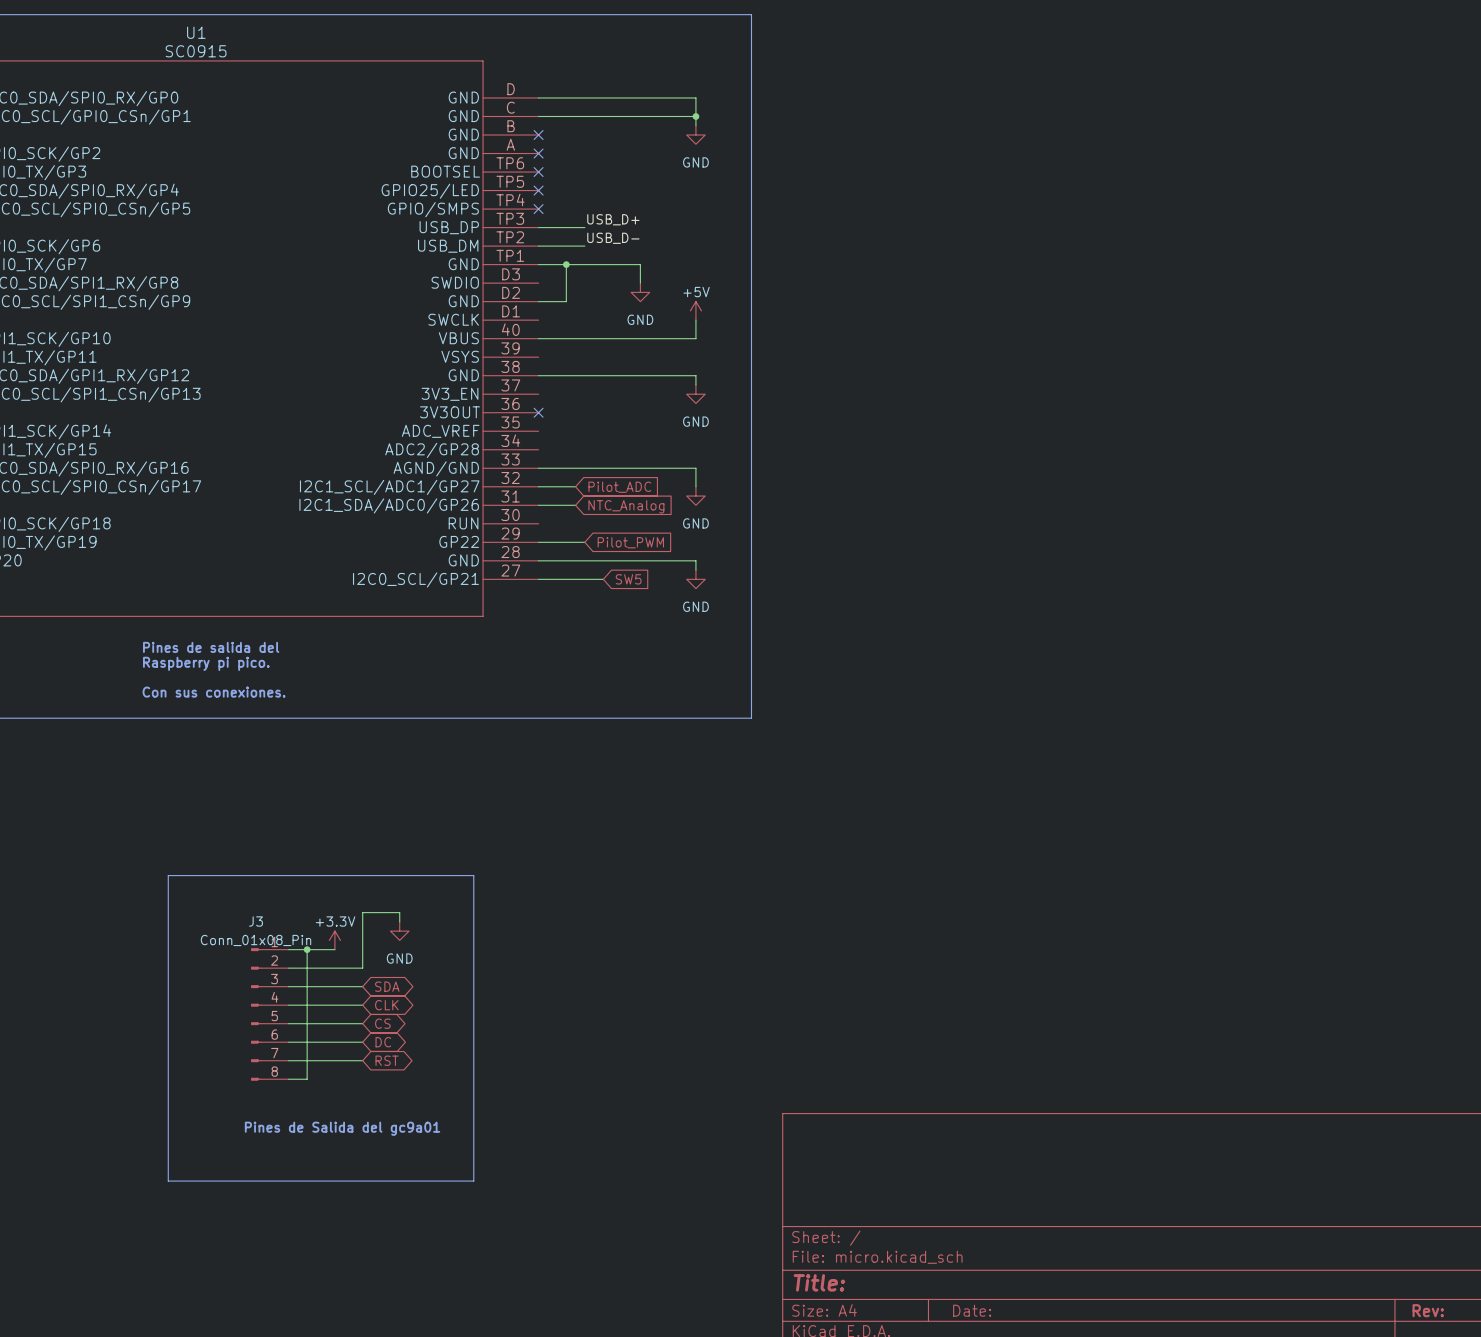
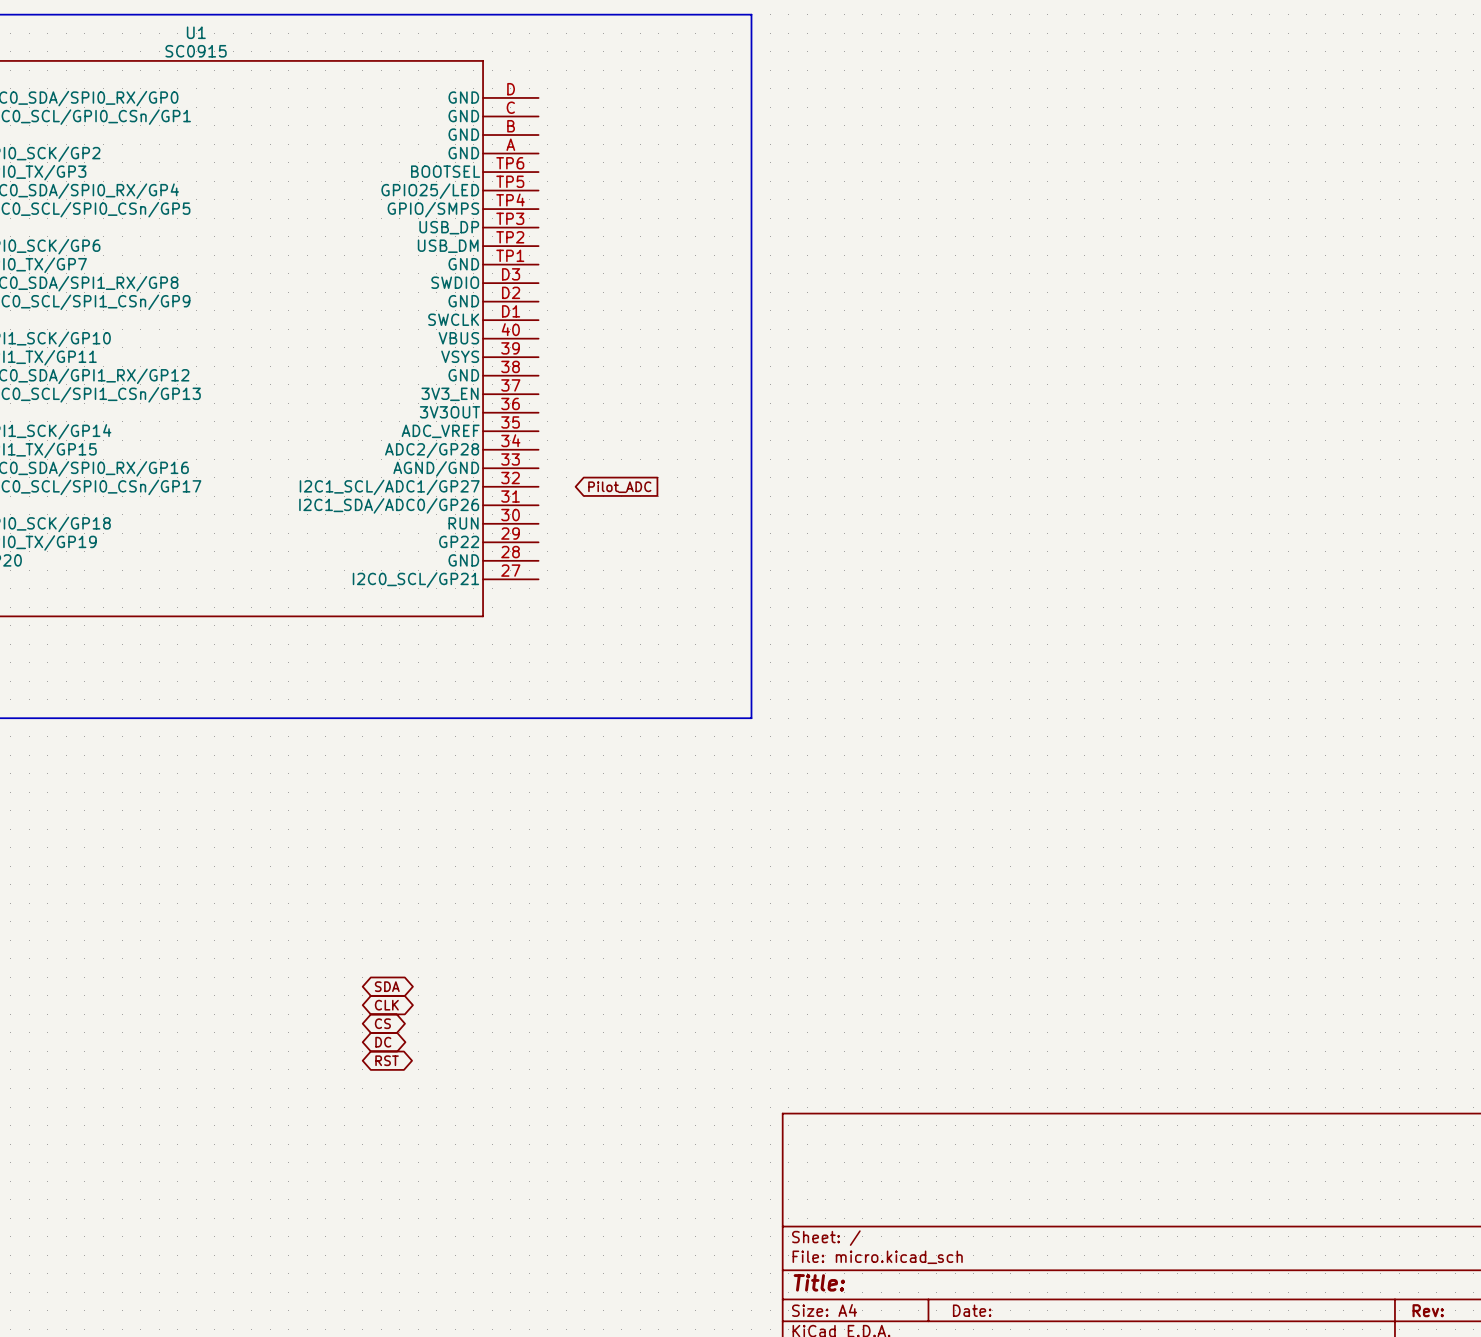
wire: (538, 97) (695, 97) (695, 125) -> none
wire: (538, 116) (695, 116) -> none
junction: (695, 116) -> none
no-connect mark: (538, 135) -> none
power symbol: GND (695, 135) -> none
no-connect mark: (538, 153) -> none
no-connect mark: (538, 172) -> none
no-connect mark: (538, 190) -> none
no-connect mark: (538, 209) -> none
label: USB_D+ (613, 219) -> none
wire: (538, 227) (584, 227) -> none
label: USB_D- (613, 238) -> none
wire: (538, 246) (584, 246) -> none
wire: (538, 264) (640, 264) (640, 283) -> none
wire: (566, 264) (566, 301) (538, 301) -> none
junction: (566, 264) -> none
power symbol: GND (640, 292) -> none
power symbol: +5V (695, 310) -> none
wire: (695, 320) (695, 338) (538, 338) -> none
wire: (538, 375) (695, 375) (695, 384) -> none
power symbol: GND (695, 394) -> none
no-connect mark: (538, 412) -> none
wire: (538, 468) (695, 468) (695, 486) -> none
wire: (538, 486) (575, 486) -> none
power symbol: GND (695, 496) -> none
wire: (538, 505) (575, 505) -> none
global label: NTC_Analog (626, 506) -> none
wire: (538, 542) (584, 542) -> none
global label: Pilot_PWM (630, 542) -> none
wire: (538, 560) (695, 560) (695, 570) -> none
wire: (538, 579) (603, 579) -> none
global label: SW5 (628, 579) -> none
power symbol: GND (695, 579) -> none
text: Pines de salida del (211, 647) -> none
text: Raspberry pi pico. (206, 663) -> none
text: Con sus conexiones. (214, 692) -> none
line: (168, 875) (473, 875) (473, 1181) (168, 1181) (168, 875) -> none
wire: (399, 921) (399, 912) (362, 912) (362, 968) (288, 968) -> none
power symbol: GND (399, 931) -> none
power symbol: +3.3V (334, 940) -> none
wire: (288, 949) (334, 949) -> none
wire: (307, 949) (307, 1079) (288, 1079) -> none
junction: (307, 949) -> none
wire: (288, 986) (362, 986) -> none
wire: (288, 1005) (362, 1005) -> none
J3: Conn_01x08_Pin (269, 1014) -> none
wire: (288, 1023) (362, 1023) -> none
wire: (288, 1042) (362, 1042) -> none
wire: (288, 1060) (362, 1060) -> none
text: Pines de Salida del gc9a01 (342, 1128) -> none

